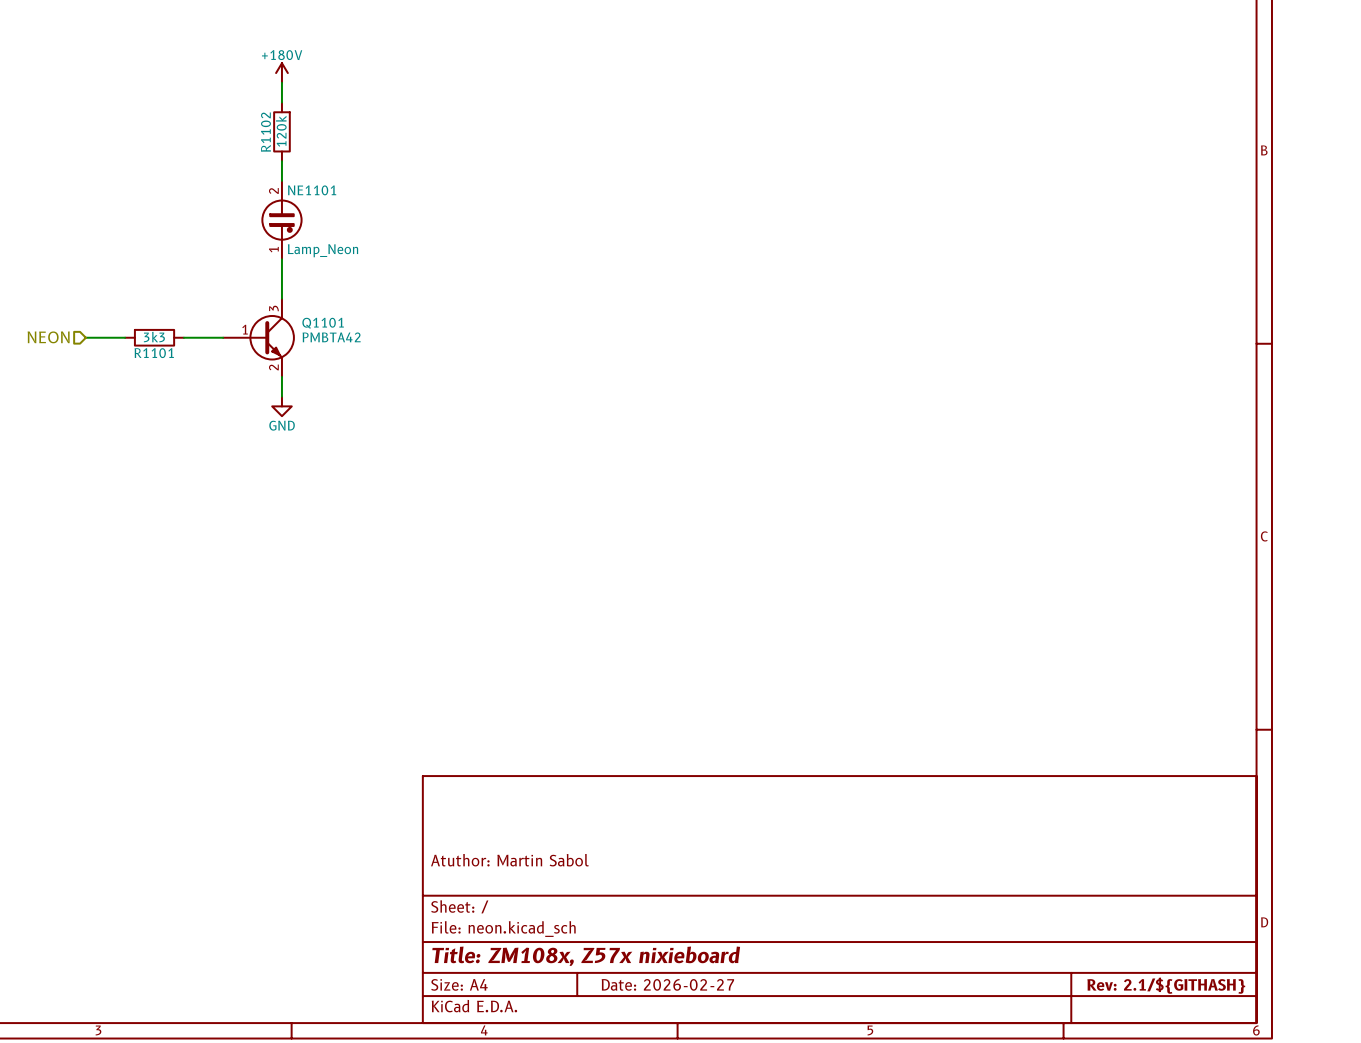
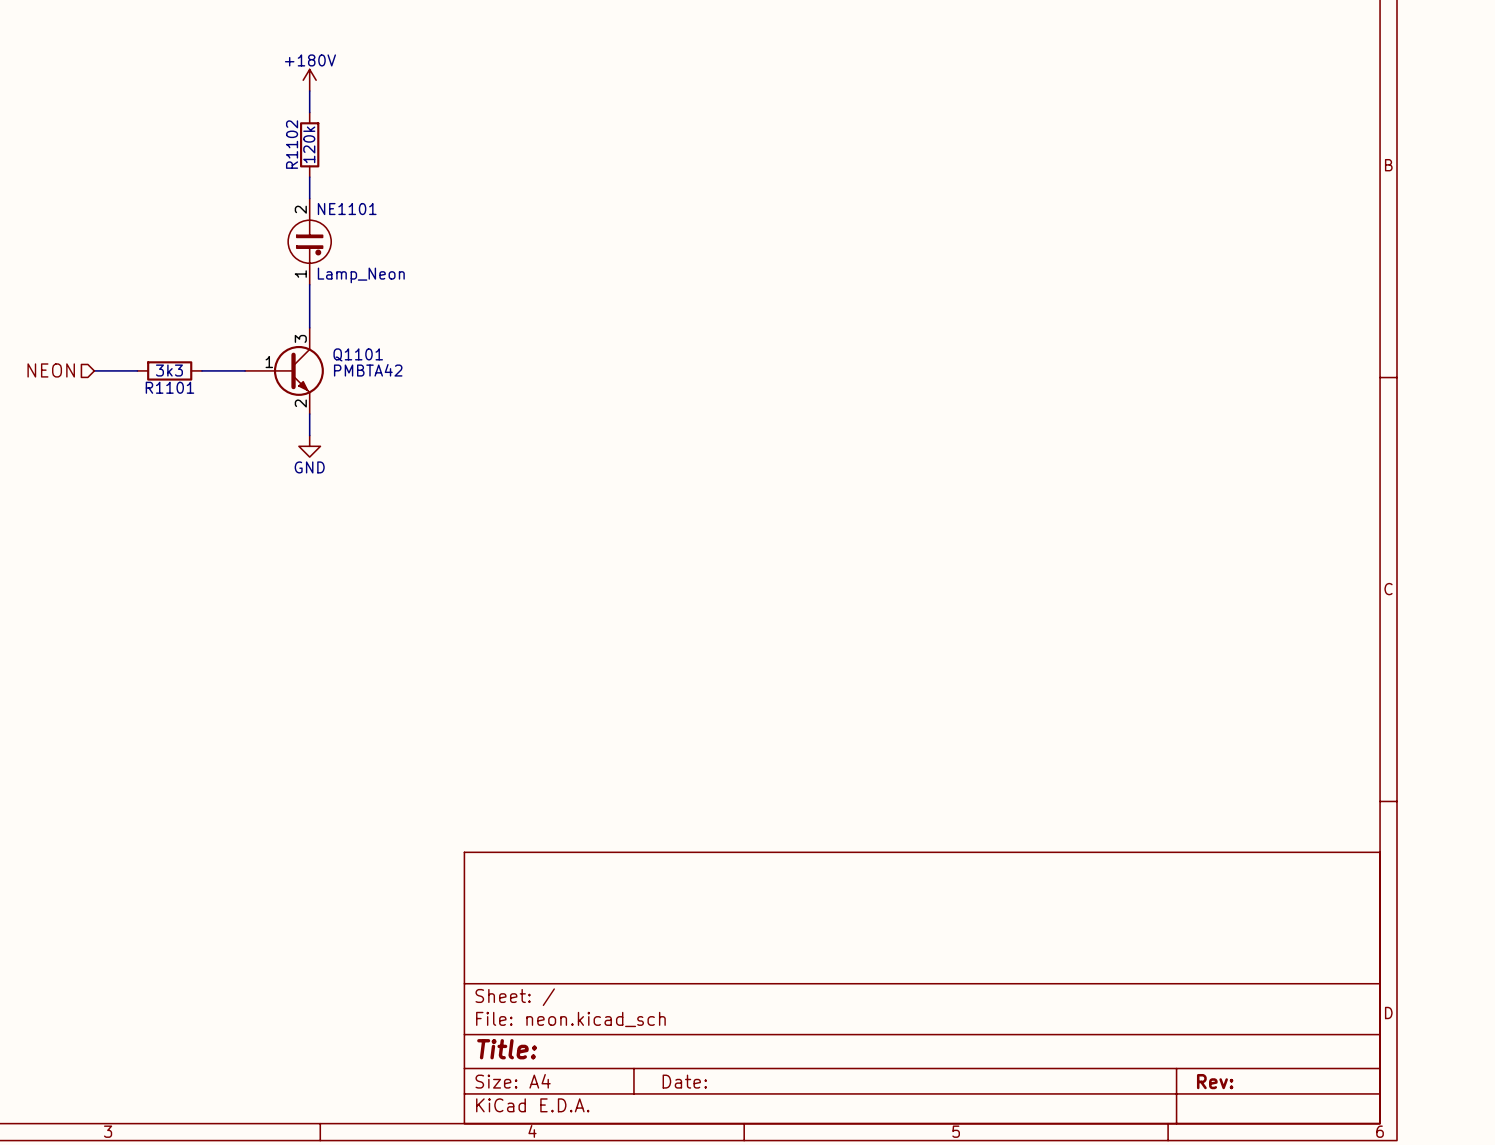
title block: Atuthor: Martin Sabol (509, 860) -> none
title block: Title: ZM108x, Z57x nixieboard (586, 956) -> Title: (507, 1049)
title block: Date: 2026-02-27 (667, 984) -> Date: (684, 1081)
title block: Rev: 2.1/${GITHASH} (1166, 985) -> Rev: (1215, 1081)

